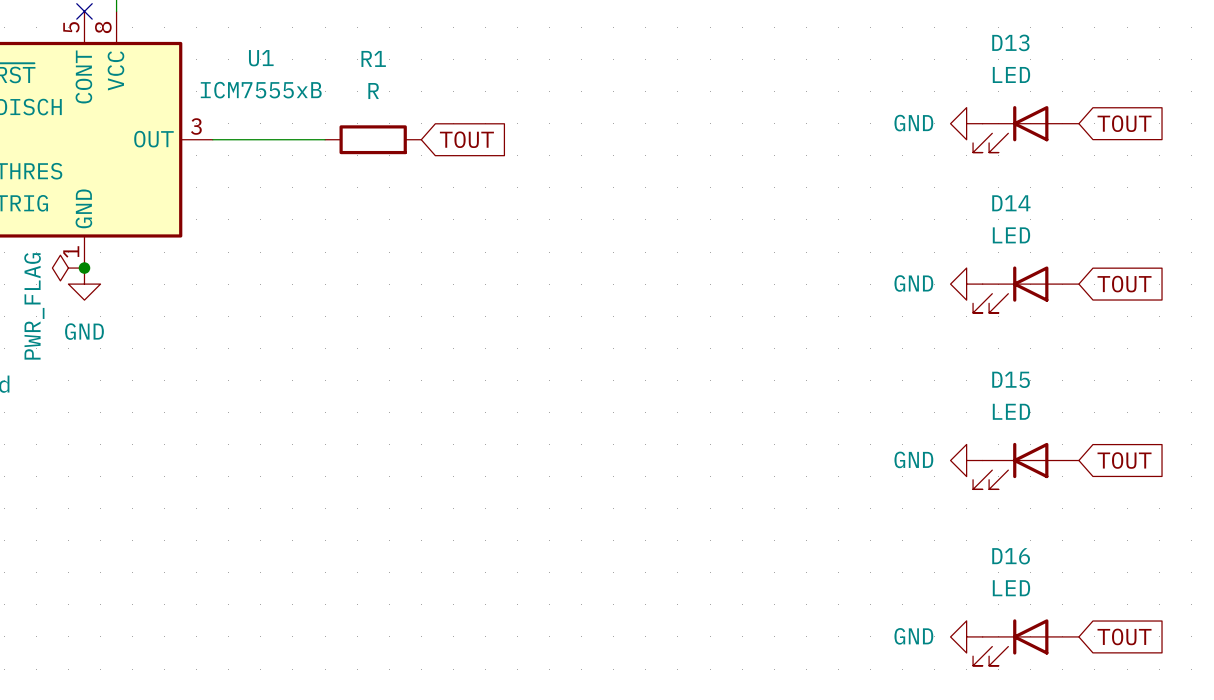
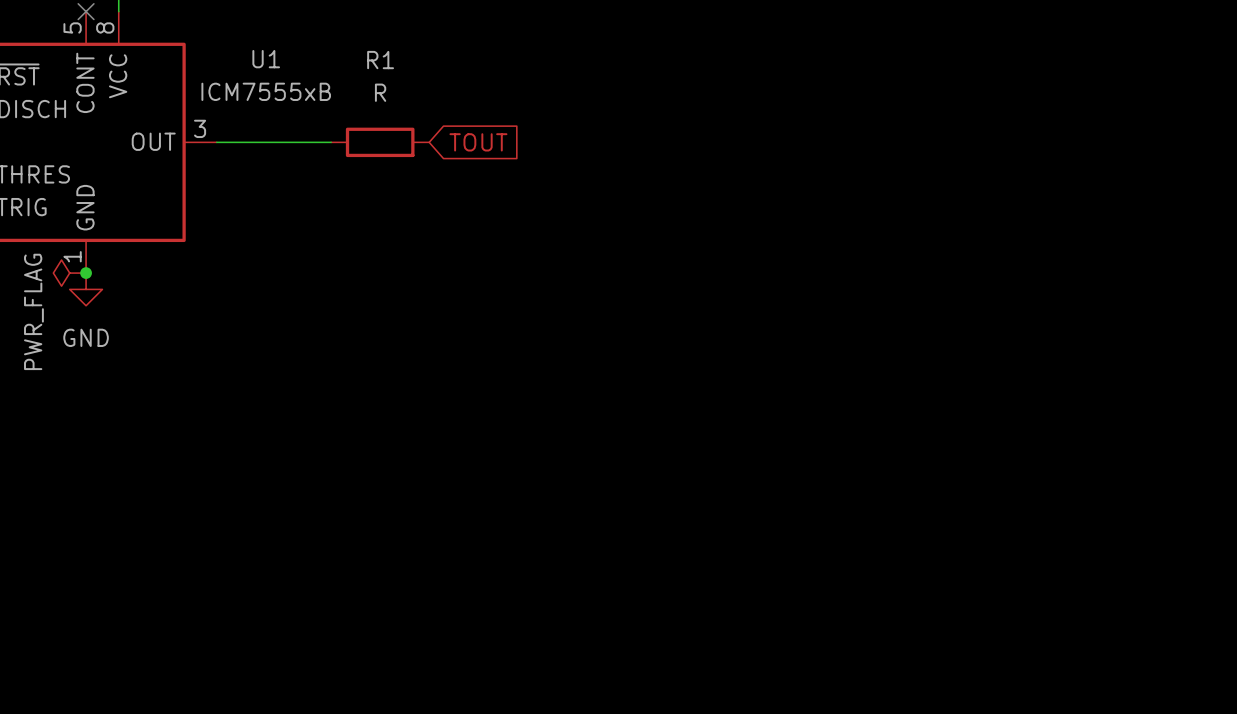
power symbol: GND (966, 123) -> none
global label: TOUT (1124, 123) -> none
D13: LED (1025, 129) -> none
power symbol: GND (966, 284) -> none
global label: TOUT (1124, 284) -> none
D14: LED (1025, 289) -> none
power symbol: GND (966, 460) -> none
global label: TOUT (1124, 460) -> none
D15: LED (1025, 466) -> none
power symbol: GND (966, 636) -> none
global label: TOUT (1124, 636) -> none
D16: LED (1025, 642) -> none

